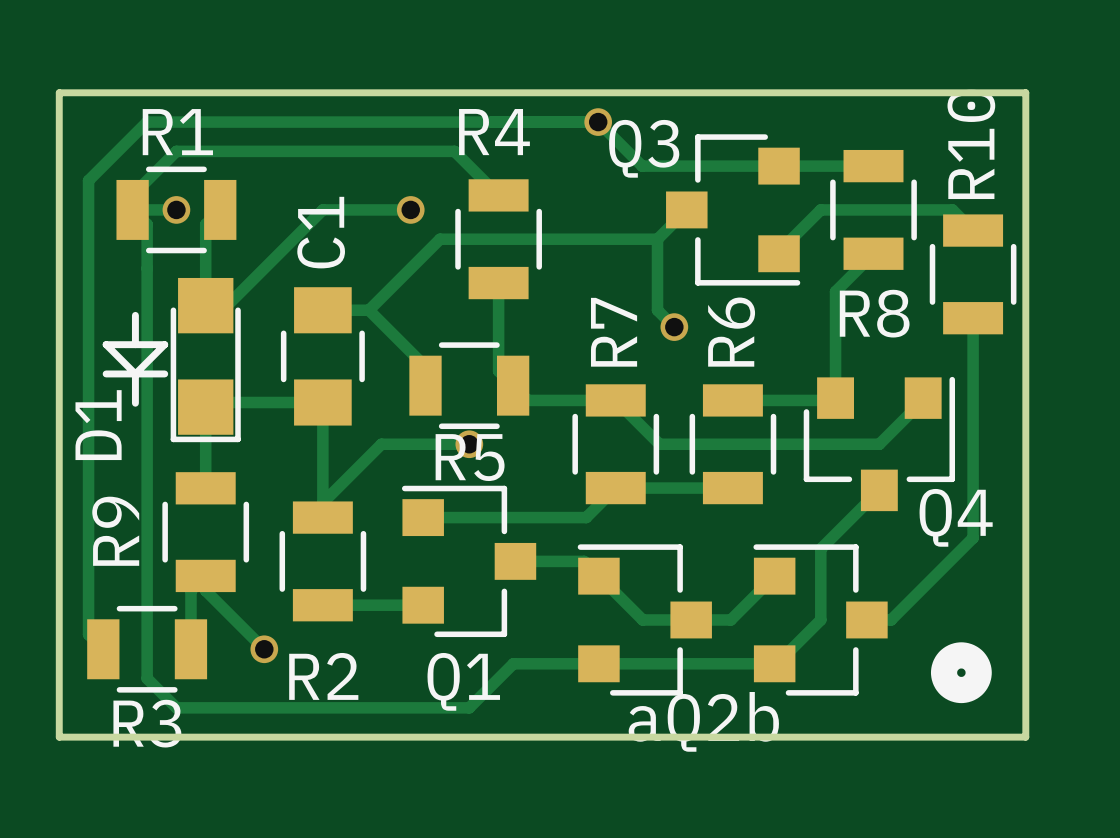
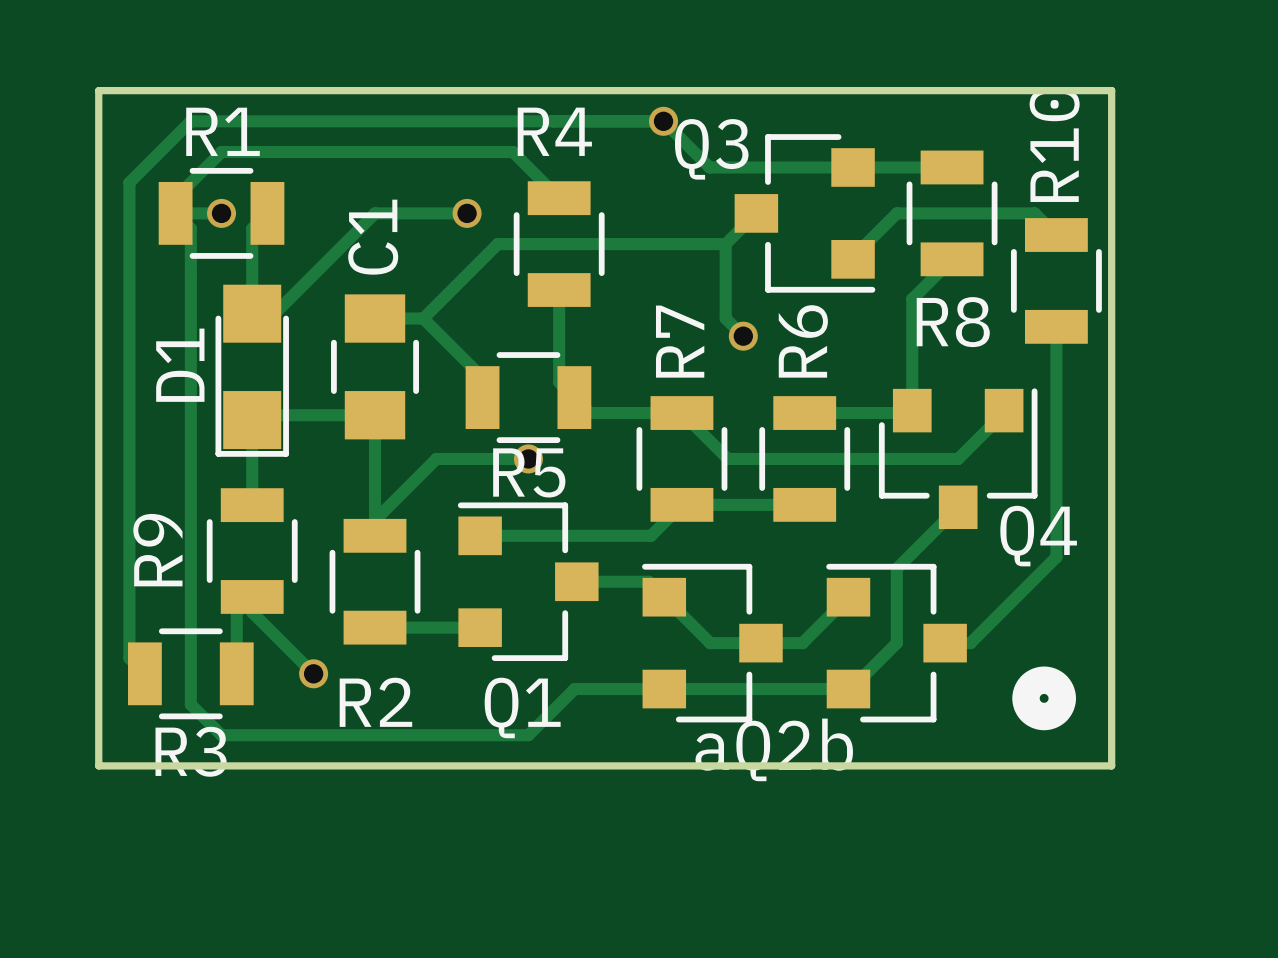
drawing: [102, 311, 169, 407] -> none
D1 name position: D1 (98, 425) -> D1 (180, 365)

